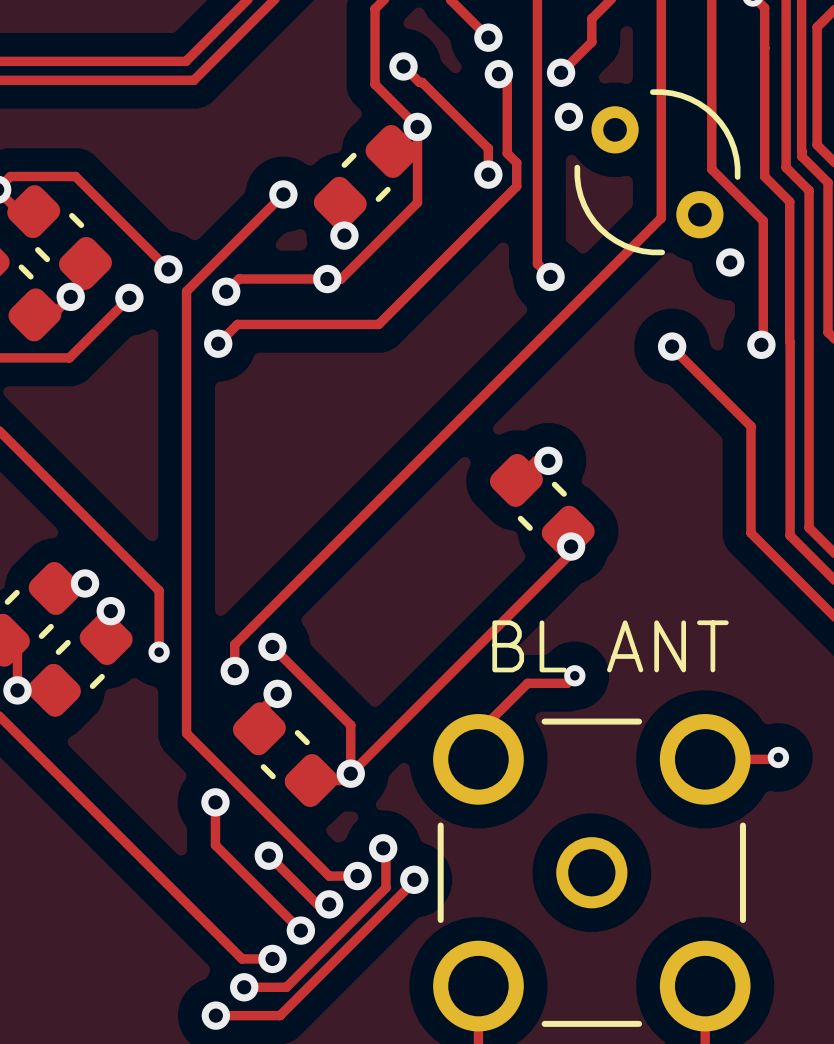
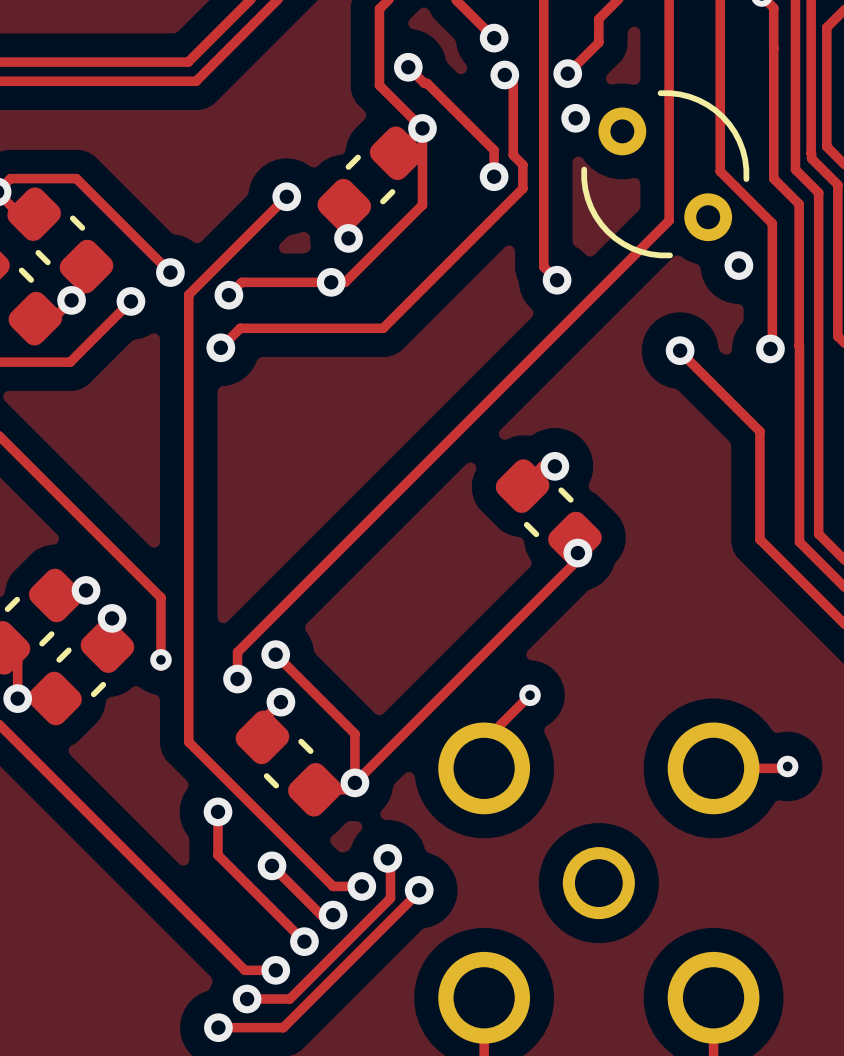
text: BL ANT (610, 646) -> none
track: (574, 675) (567, 683) (527, 683) (523, 687) -> none
via position: (574, 675) -> (530, 695)
part side: top (591, 872) -> bottom (598, 883)

